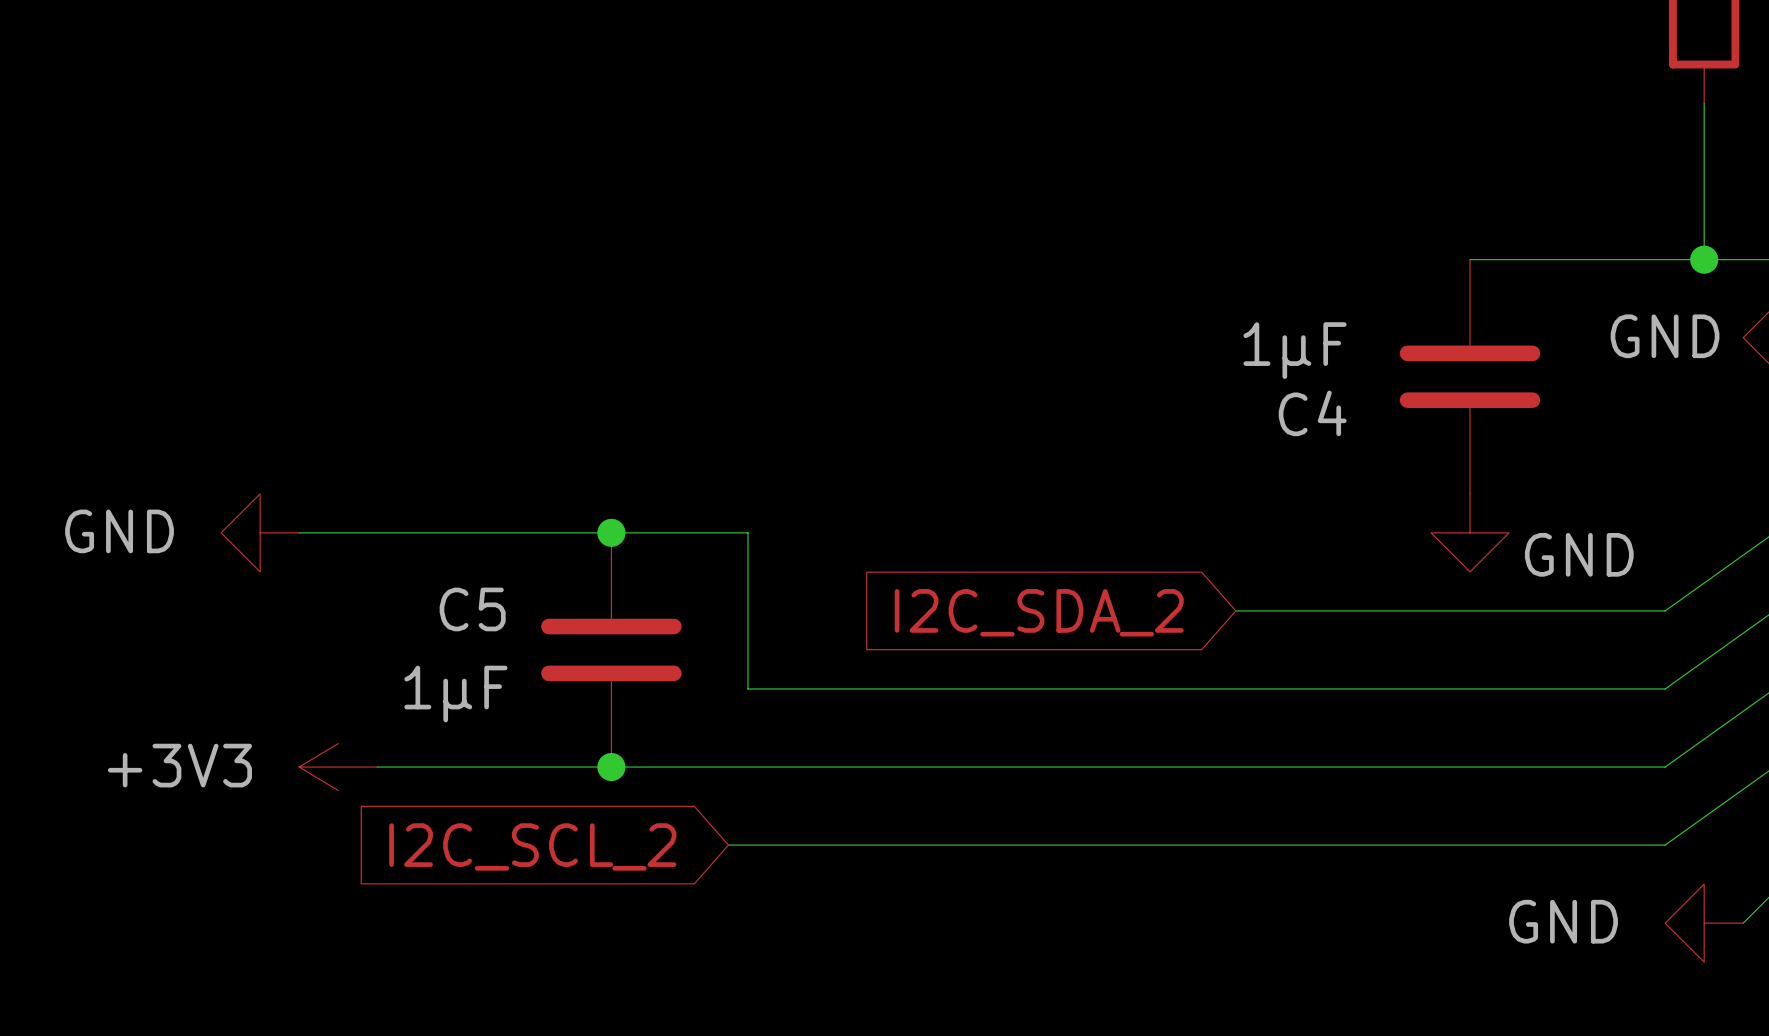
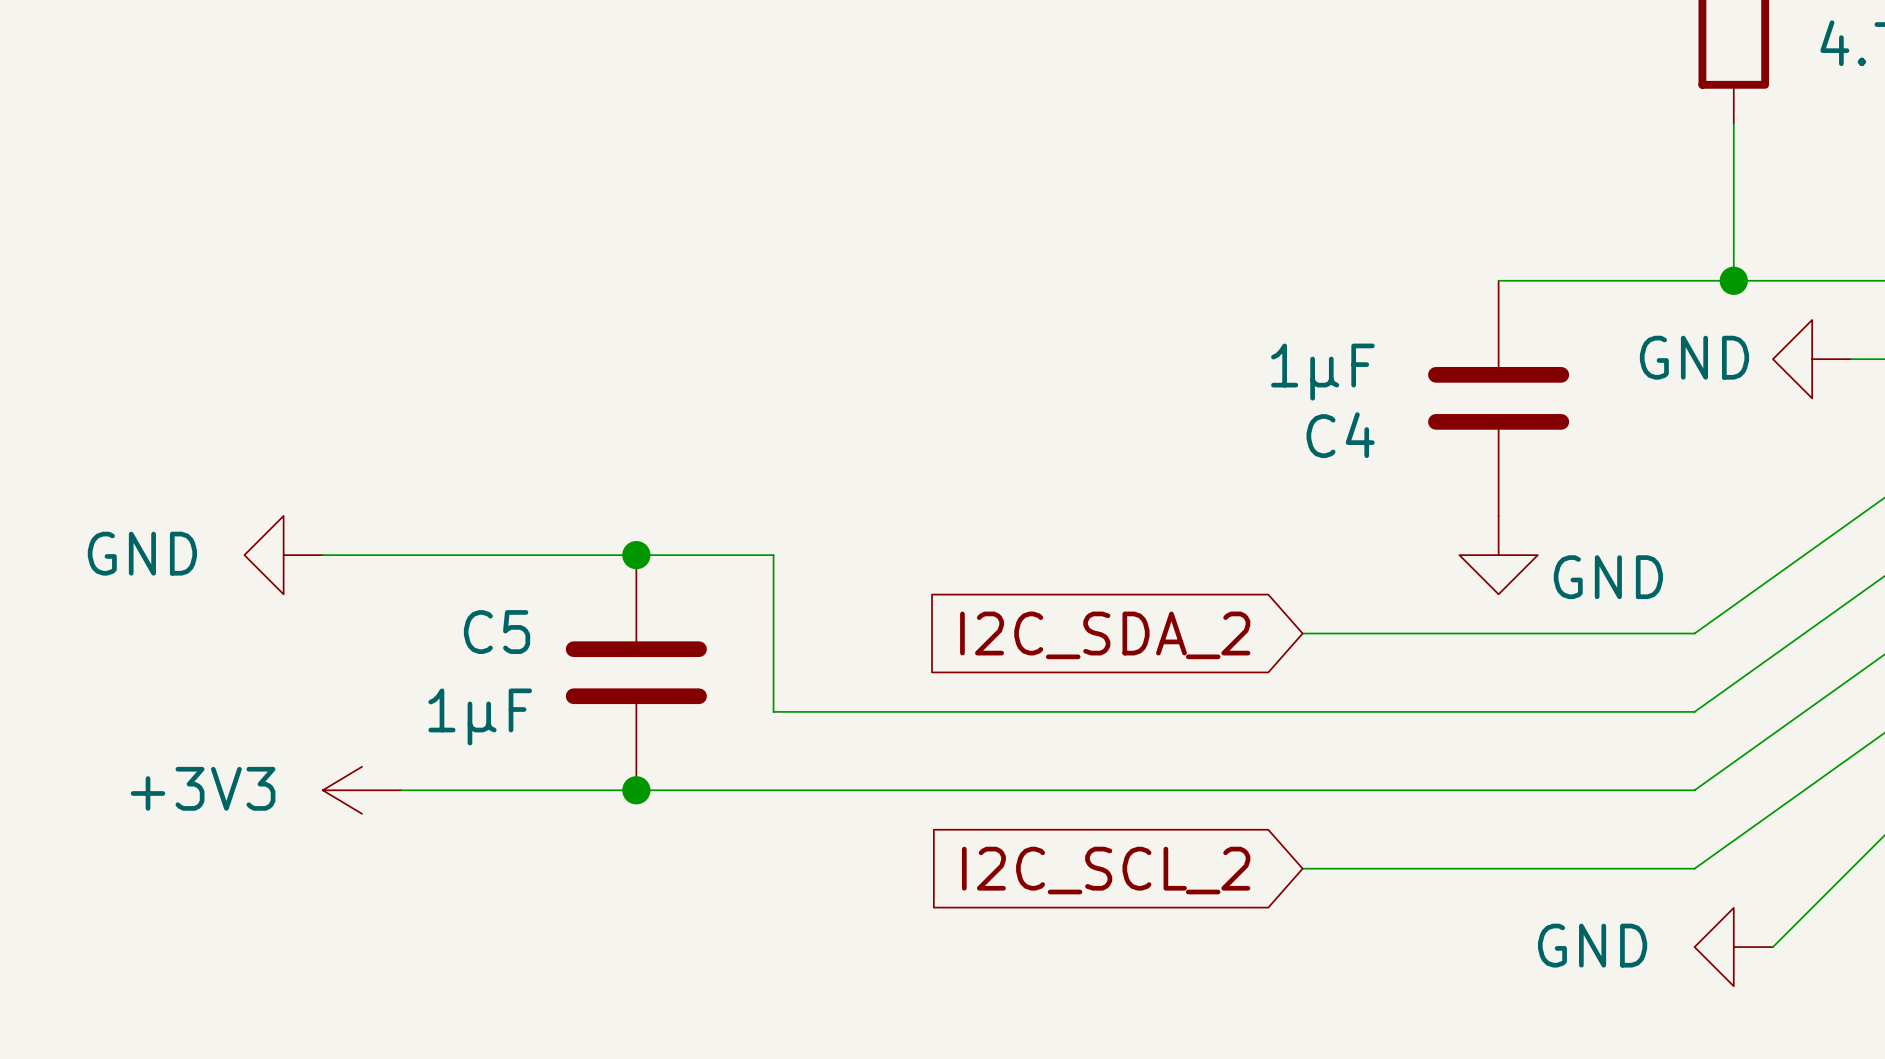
wire: (1235, 610) (1274, 610) -> none
global label position: I2C_SDA_2 (1039, 612) -> I2C_SDA_2 (1105, 635)
wire: (728, 845) (1274, 845) -> none
global label position: I2C_SCL_2 (532, 846) -> I2C_SCL_2 (1106, 870)

